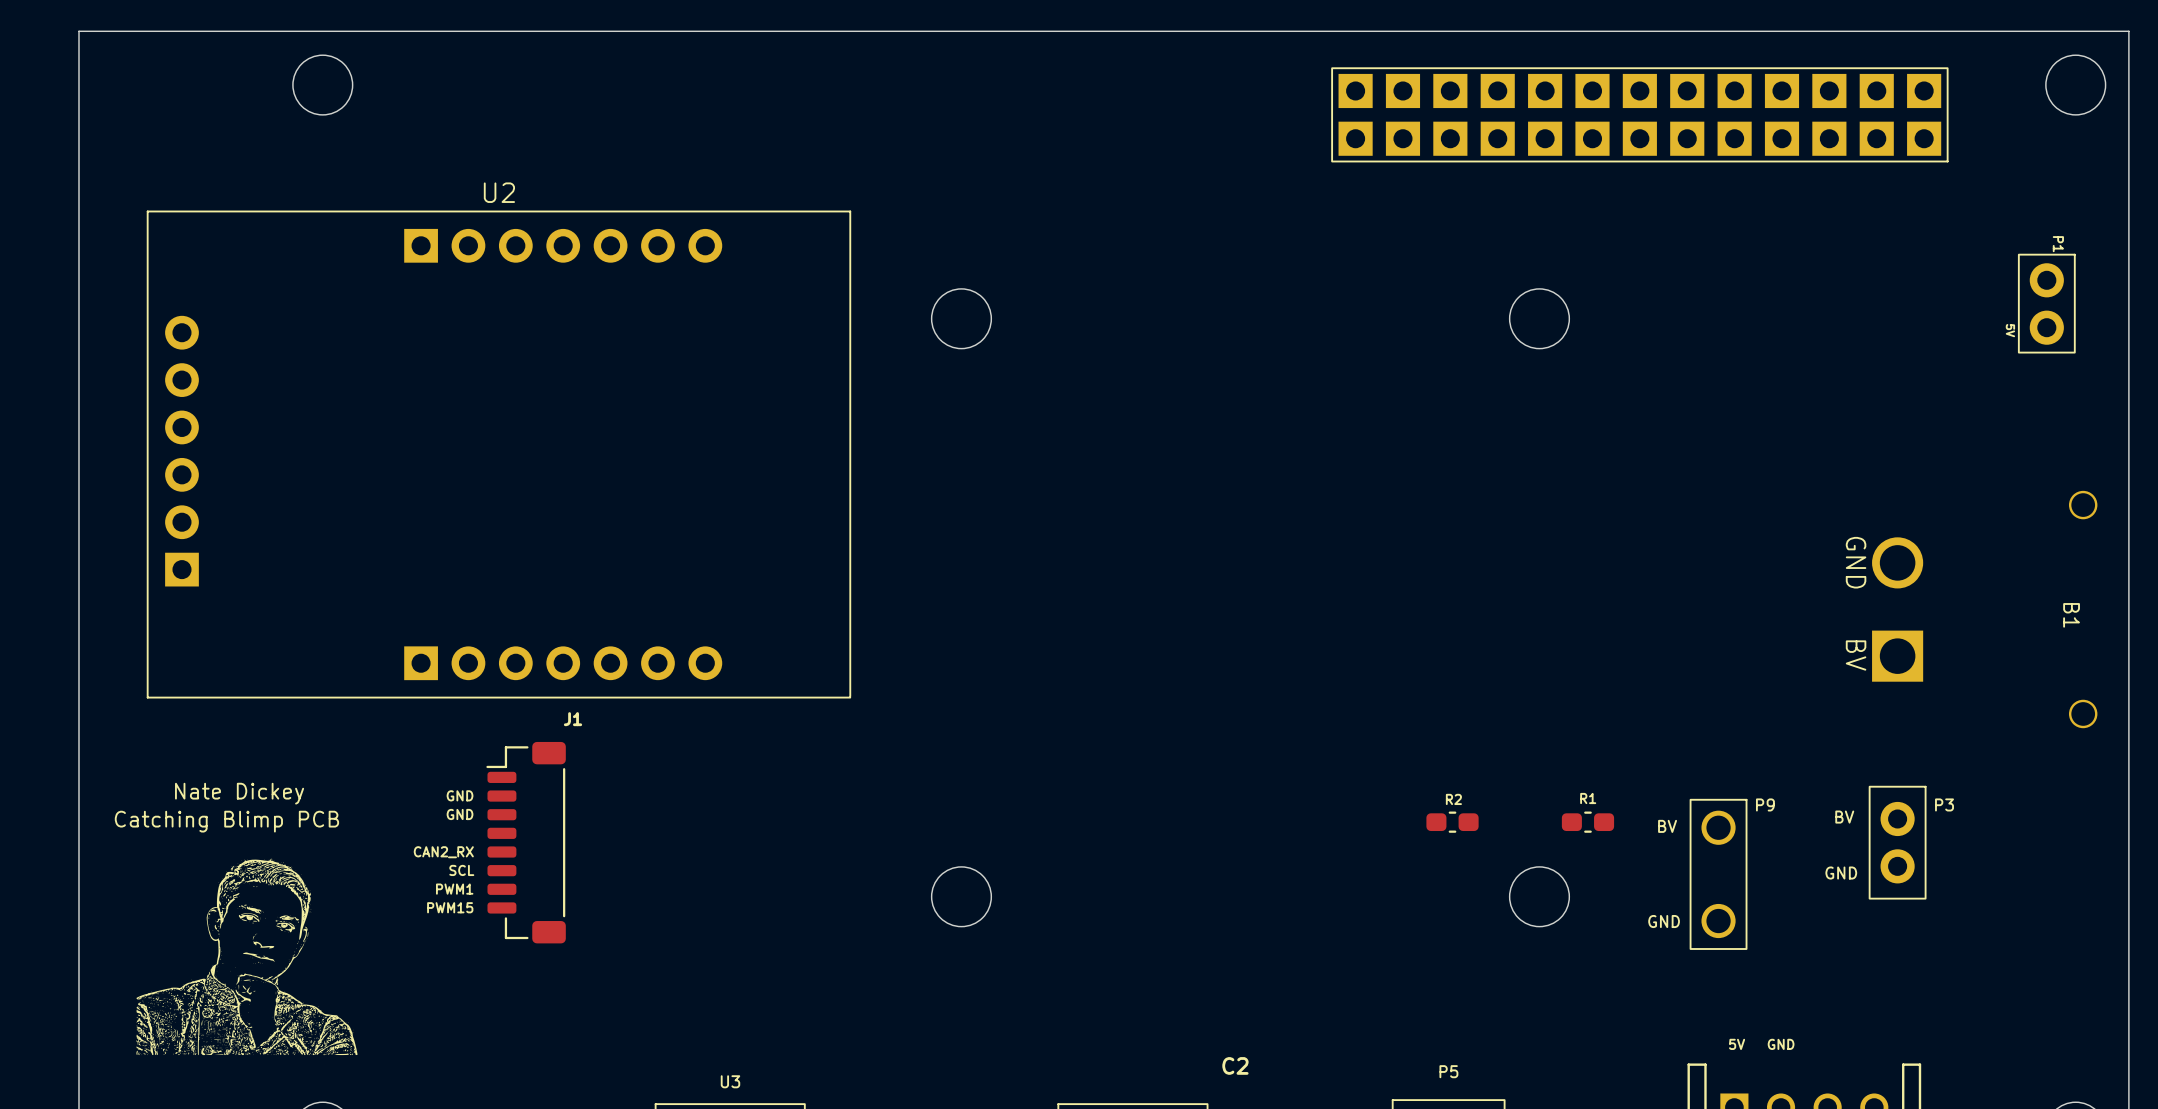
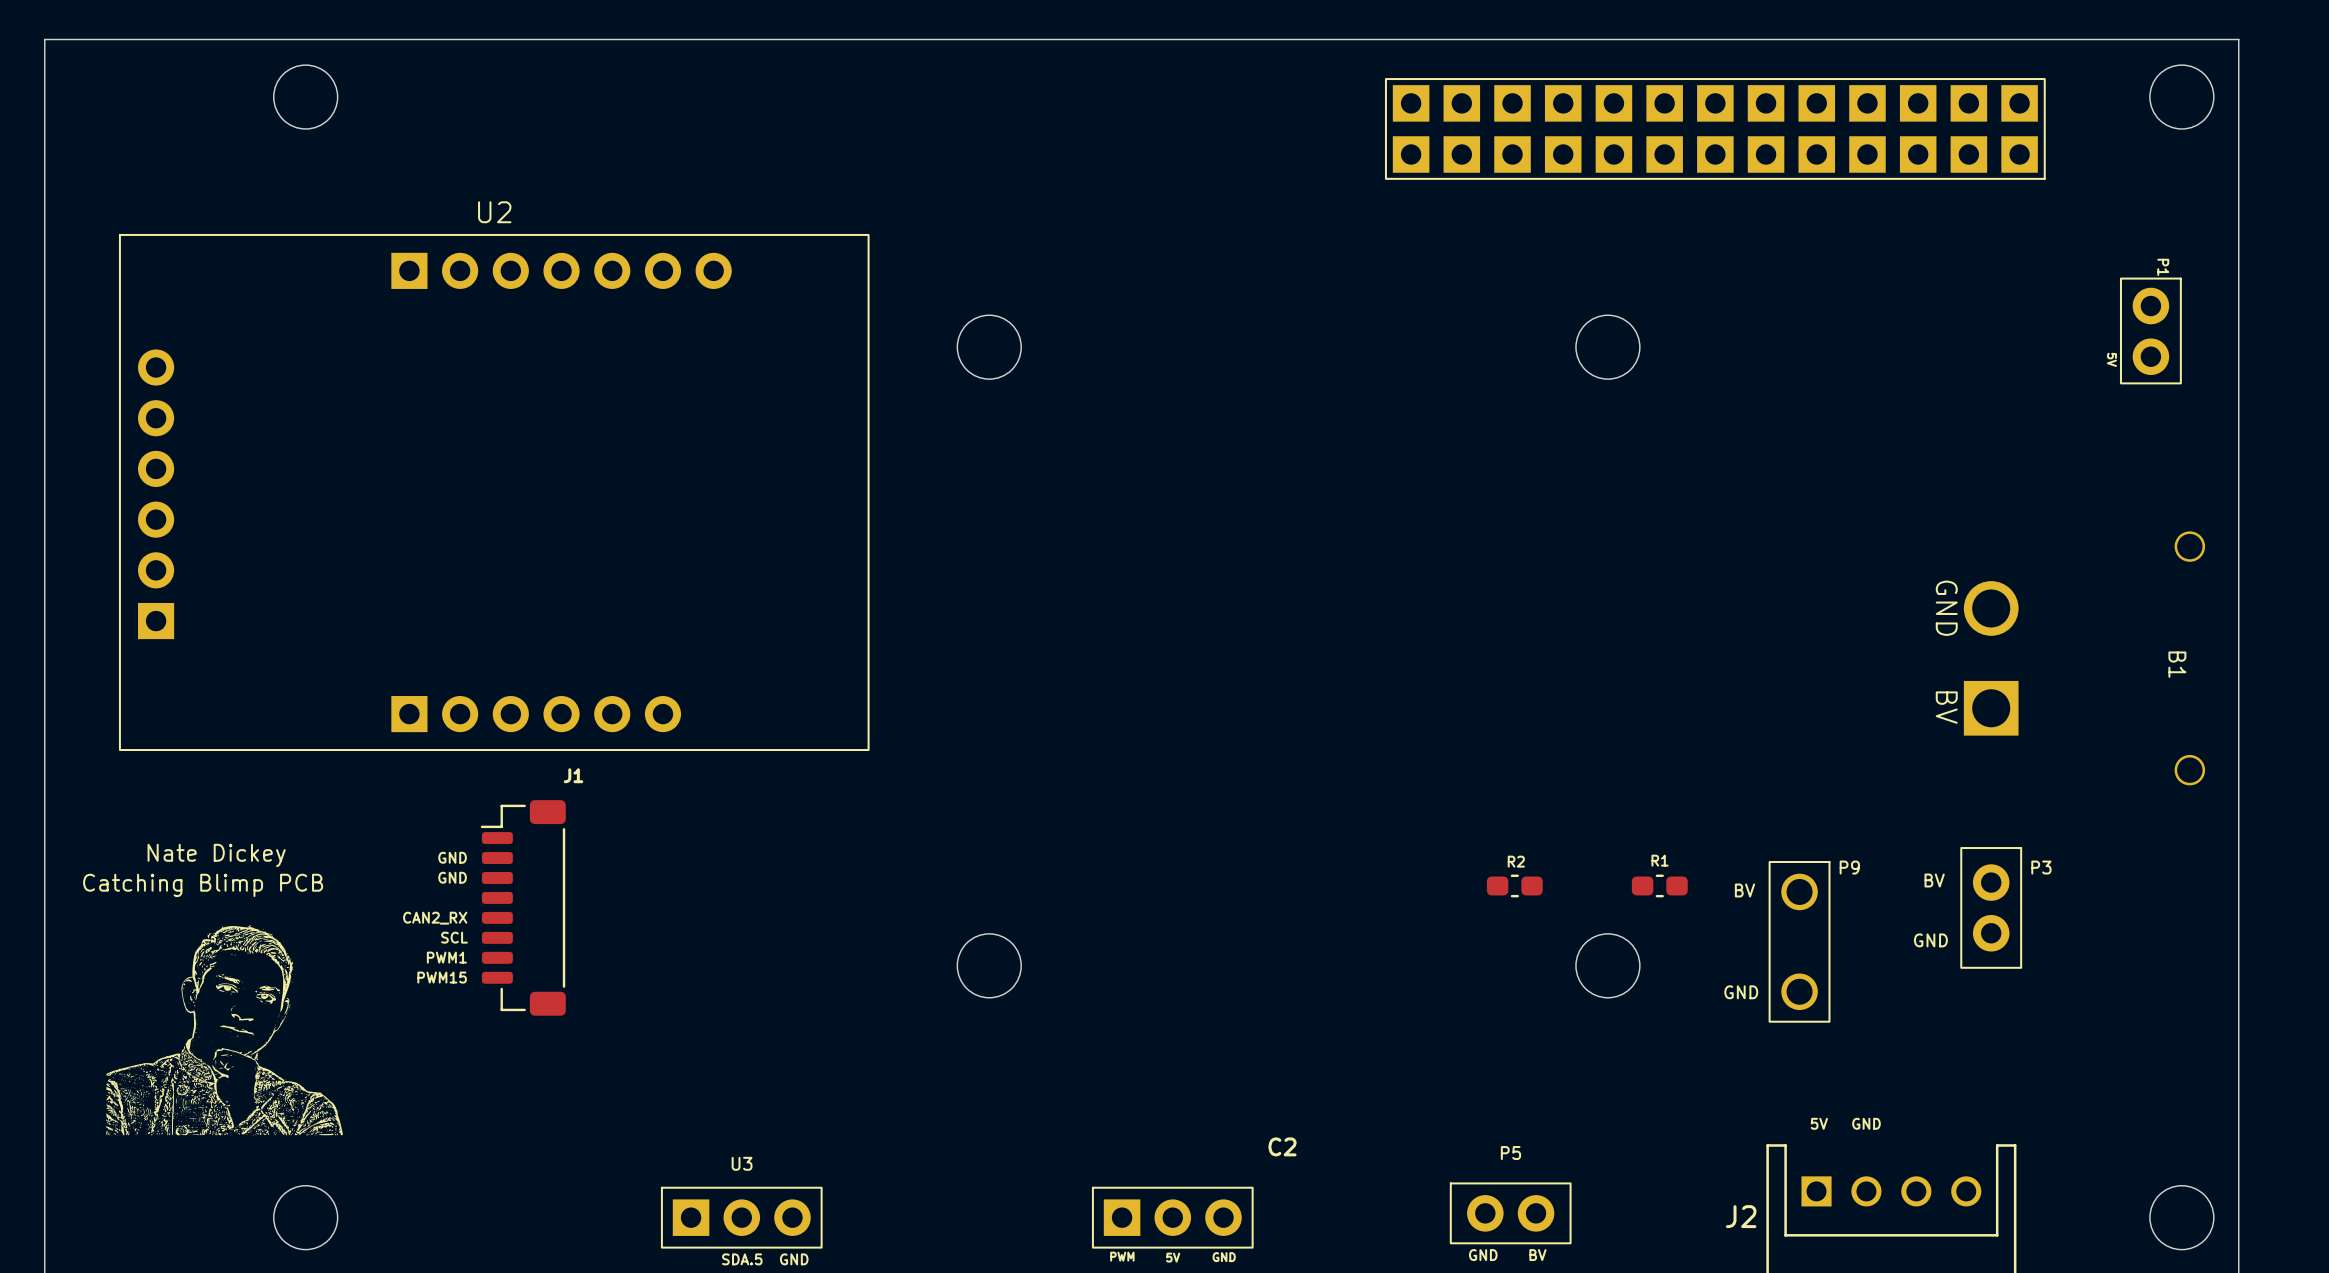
U2 footprint: [146, 210, 852, 699] -> [118, 233, 870, 752]

